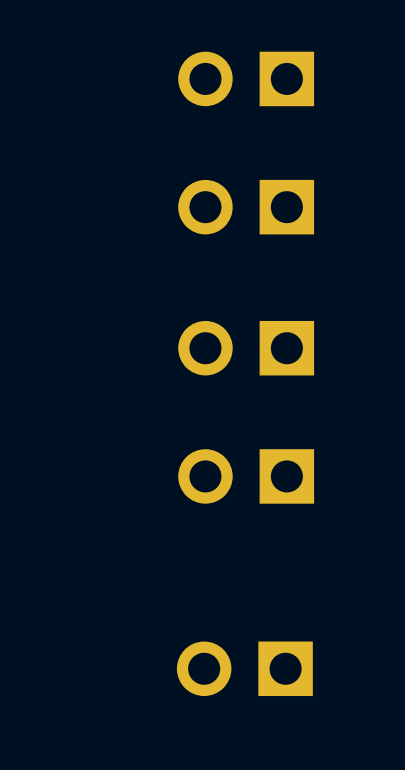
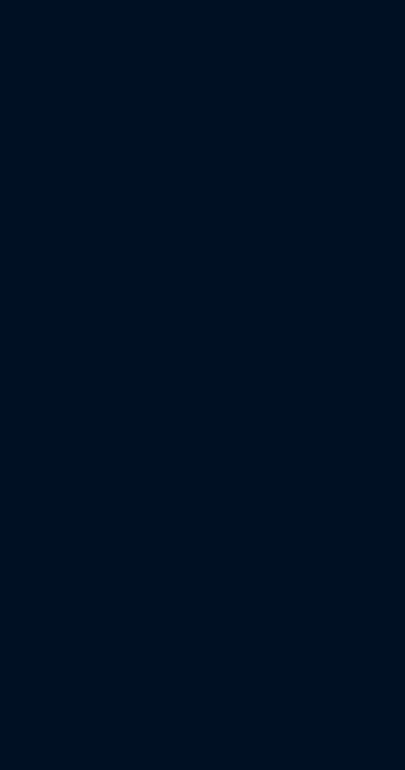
part: (246, 78) -> none
part: (246, 207) -> none
part: (246, 348) -> none
part: (246, 476) -> none
part: (244, 668) -> none

